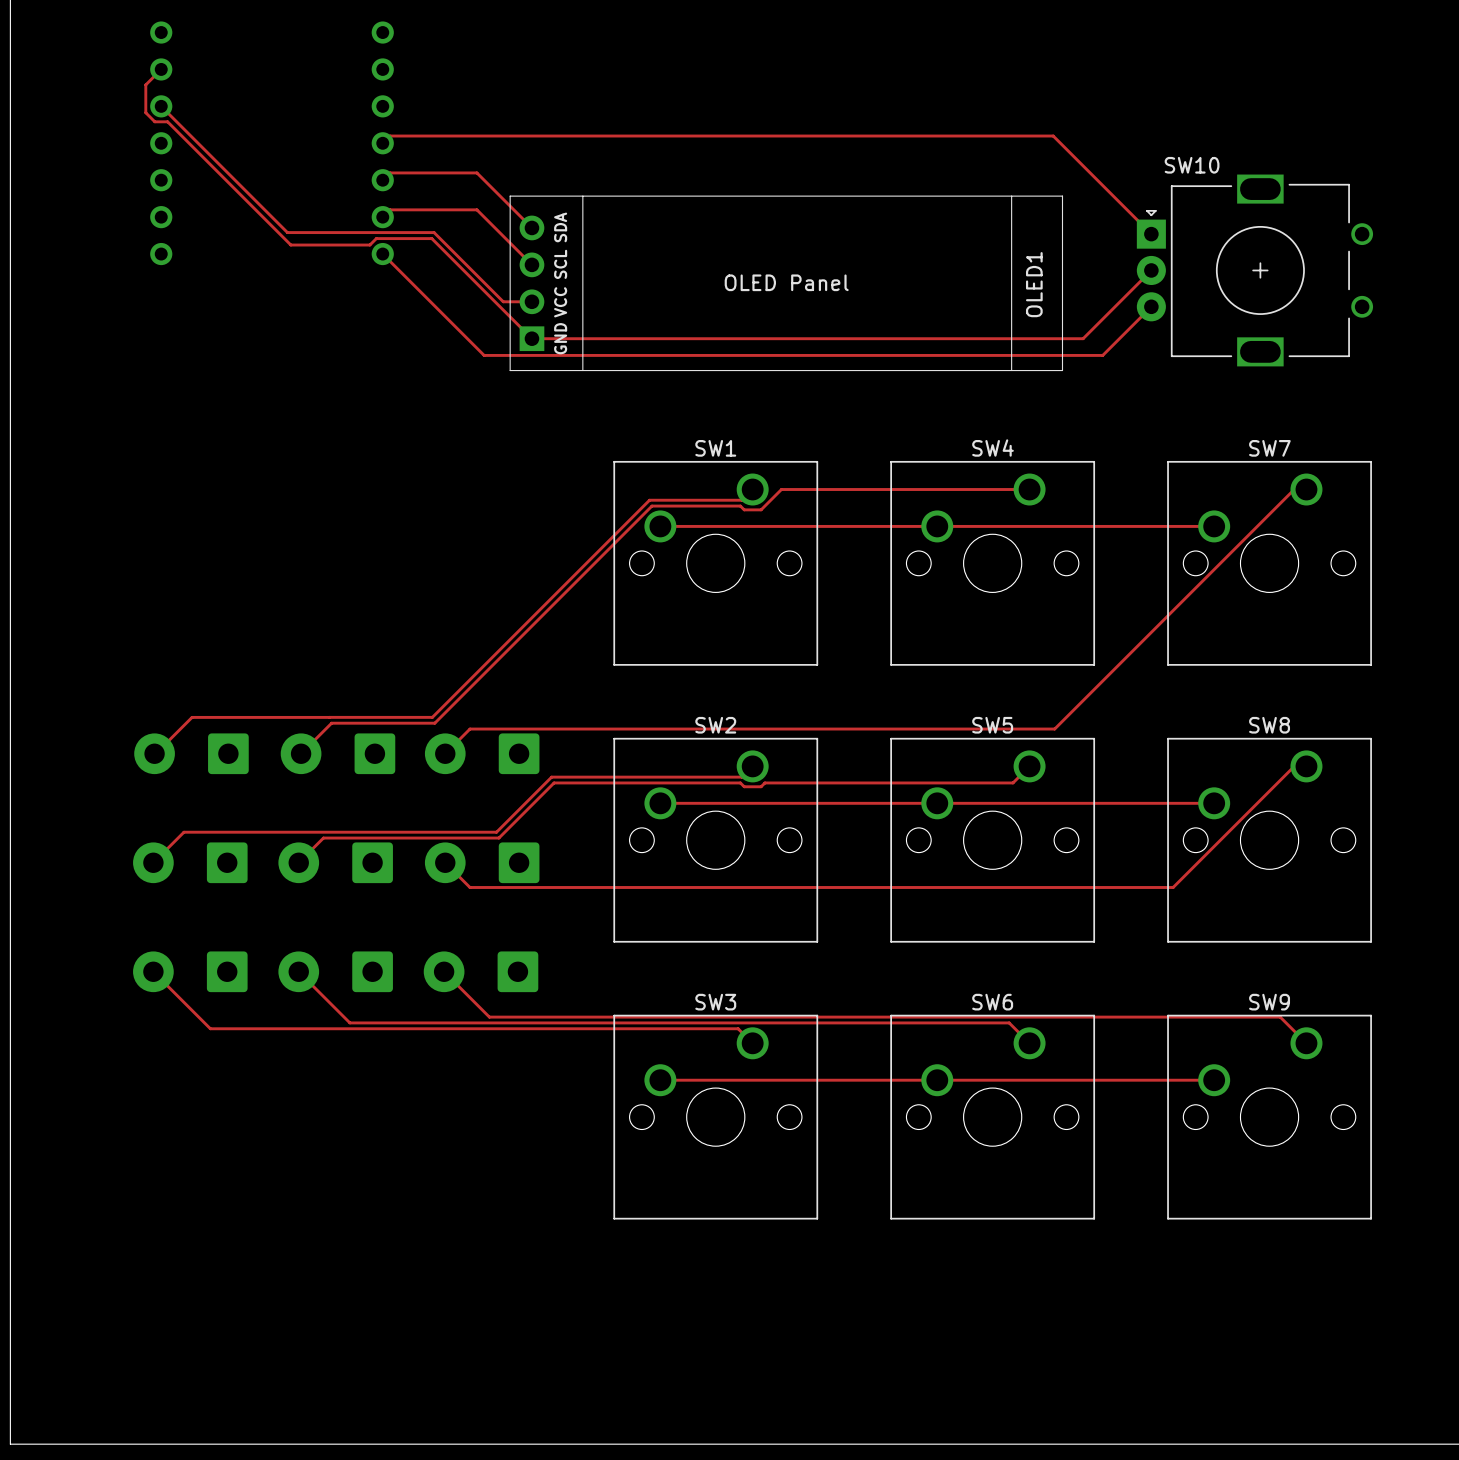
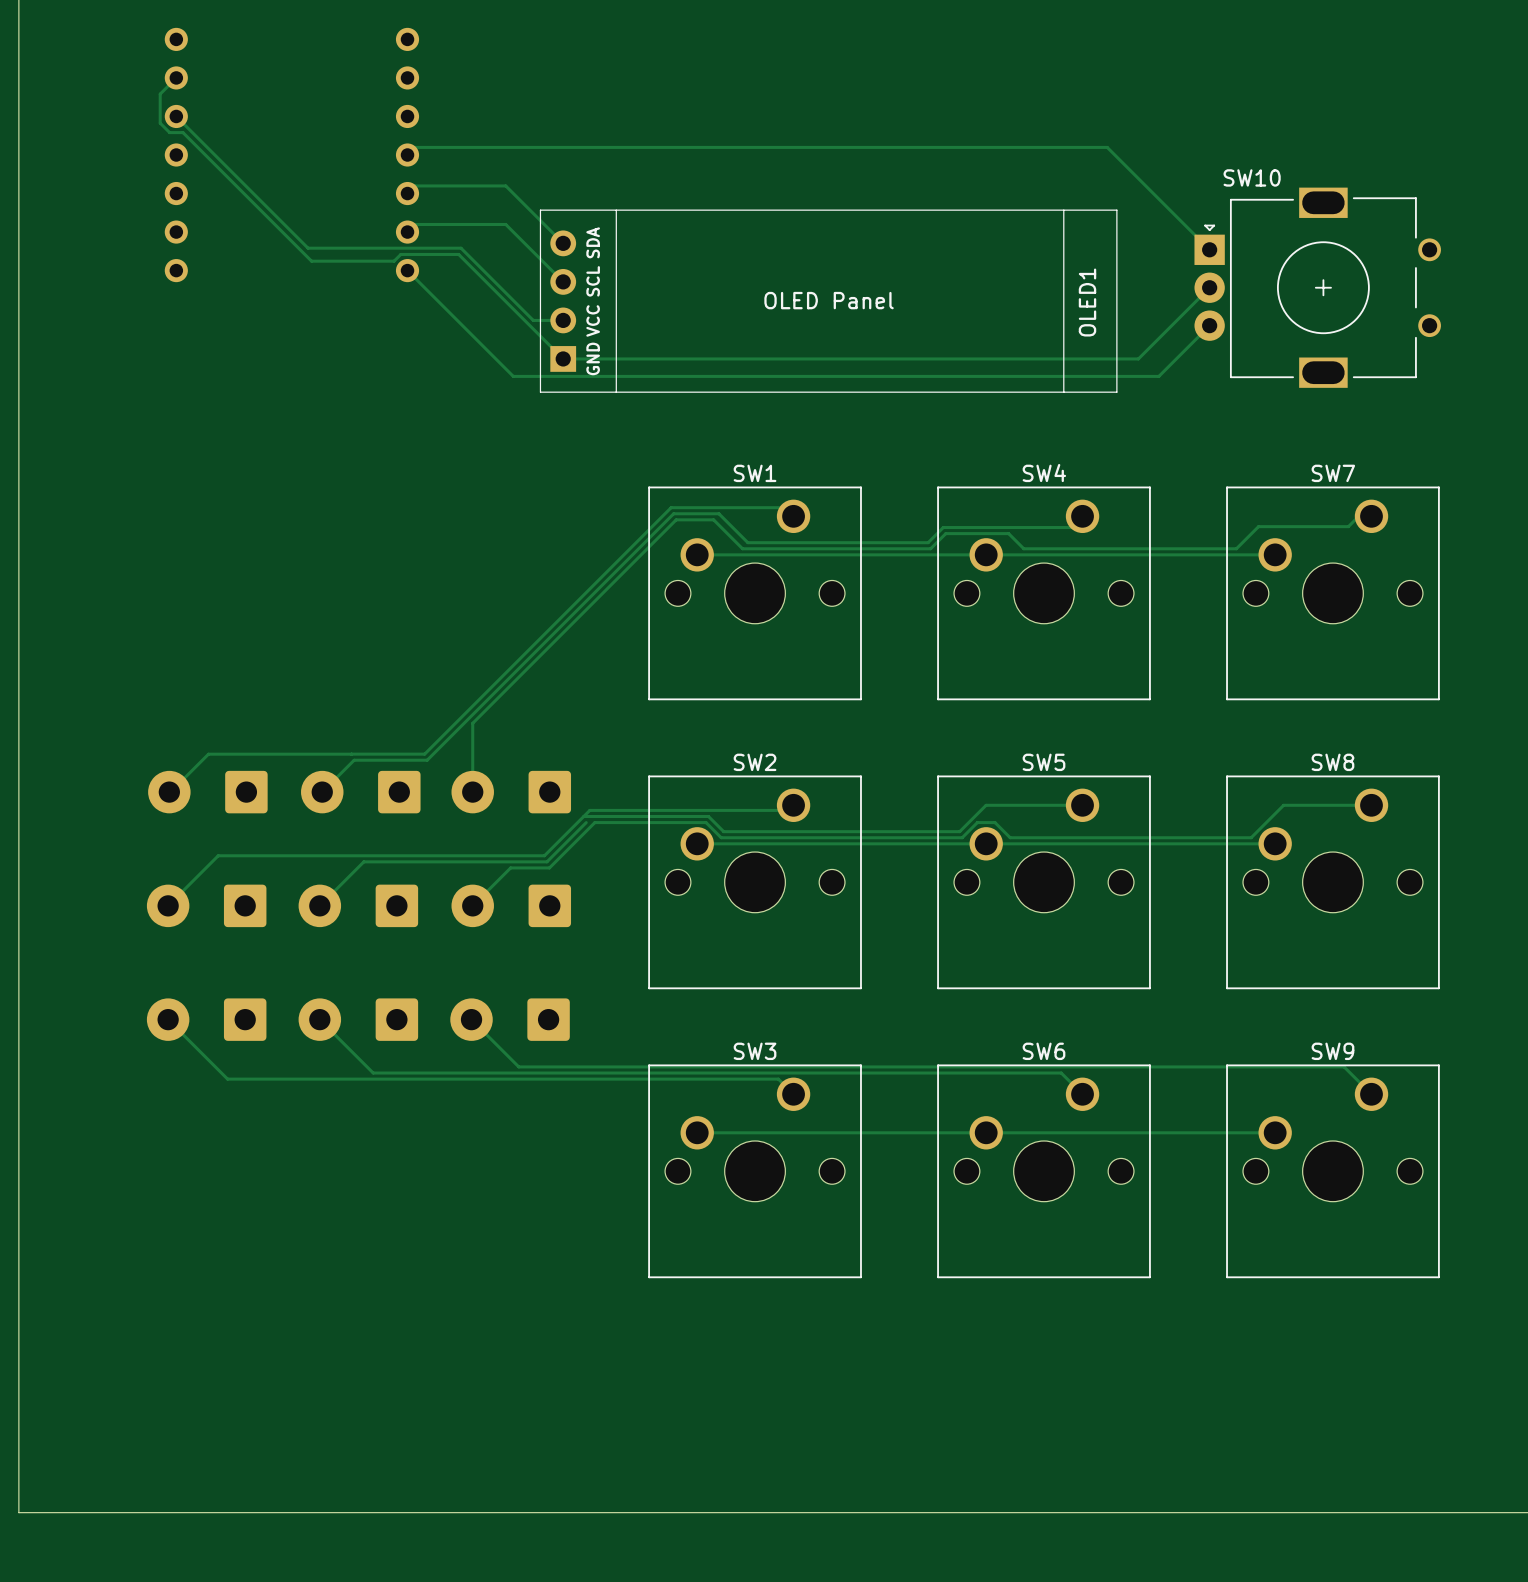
track: (752, 489) (741, 500) (649, 500) (432, 717) (399, 717) -> (793, 516) (784, 507) (671, 507) (424, 754)
track: (1029, 489) (781, 489) (761, 509) (744, 509) (740, 506) (651, 506) (434, 723) (401, 723) -> (1082, 516) (1071, 527) (943, 527) (928, 542) (747, 542) (718, 513) (673, 513) (427, 760)
track: (1284, 499) (1054, 729) (469, 729) (445, 753) -> (1348, 526) (1258, 526) (1236, 548) (1023, 548) (1008, 533) (945, 533) (930, 548) (742, 548) (713, 519) (676, 519) (472, 723) (472, 792)
track: (1029, 766) (1013, 782) (945, 782) -> (1358, 805) (1283, 805) (1251, 837) (1010, 837) (995, 822)
track: none -> (1082, 805) (986, 805) (959, 831) (723, 831) (708, 816)
track: (1294, 766) (1173, 887) (469, 887) (445, 862) -> none
track: (747, 771) (741, 777) (671, 777) -> (788, 810) (589, 810) (583, 816)
track: (554, 782) (562, 782) -> (472, 905) (510, 867) (549, 867) (594, 822)
track: (668, 782) (740, 782) (744, 786) (761, 786) (764, 782) (928, 782) -> (706, 822) (721, 837) (962, 837) (977, 822)
track: (514, 814) (496, 832) (183, 832) -> (544, 855) (218, 855) (200, 873)
track: (516, 820) (498, 838) (323, 838) -> (546, 861) (363, 861) (345, 880)

